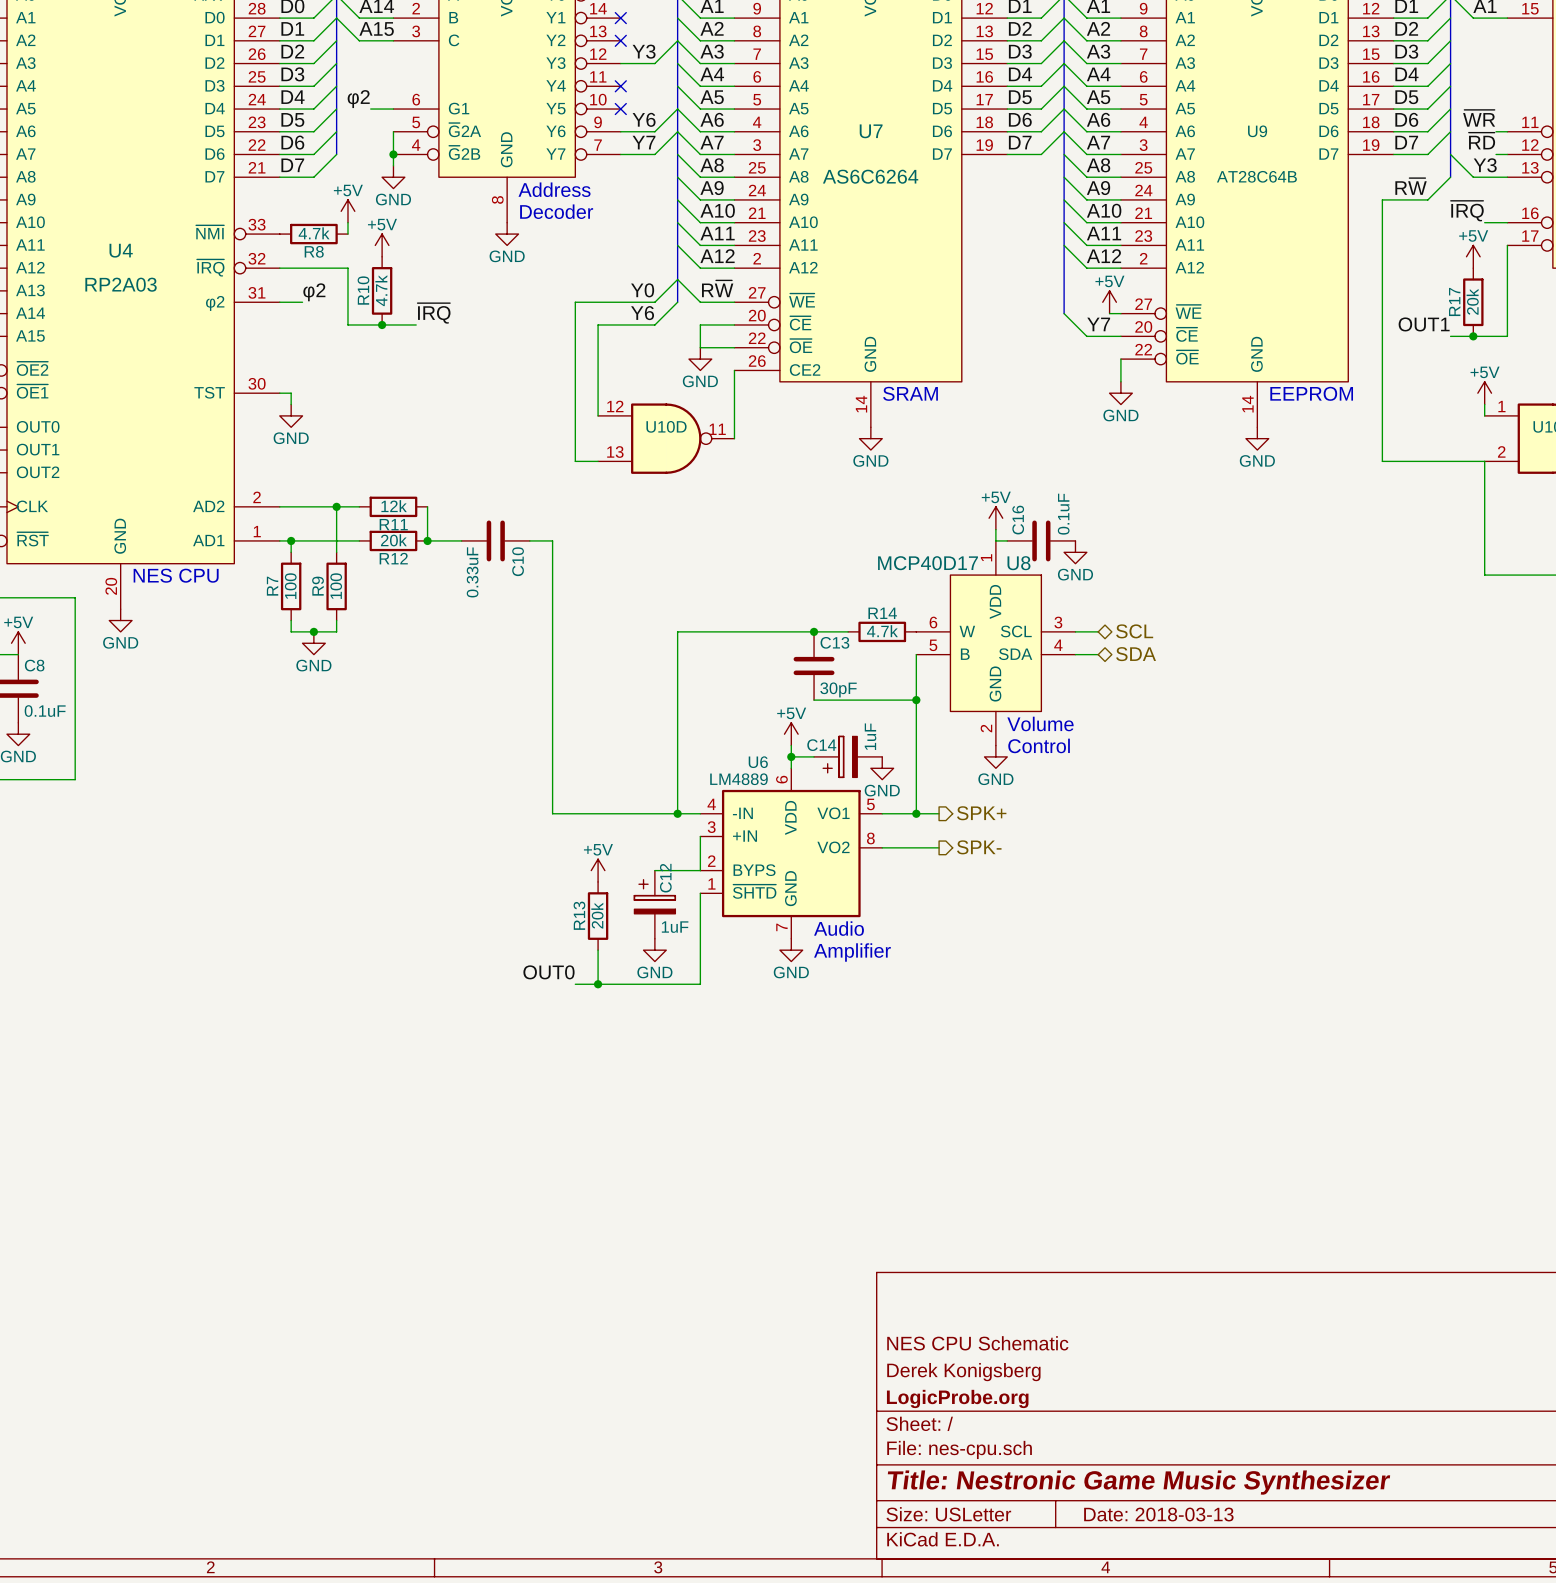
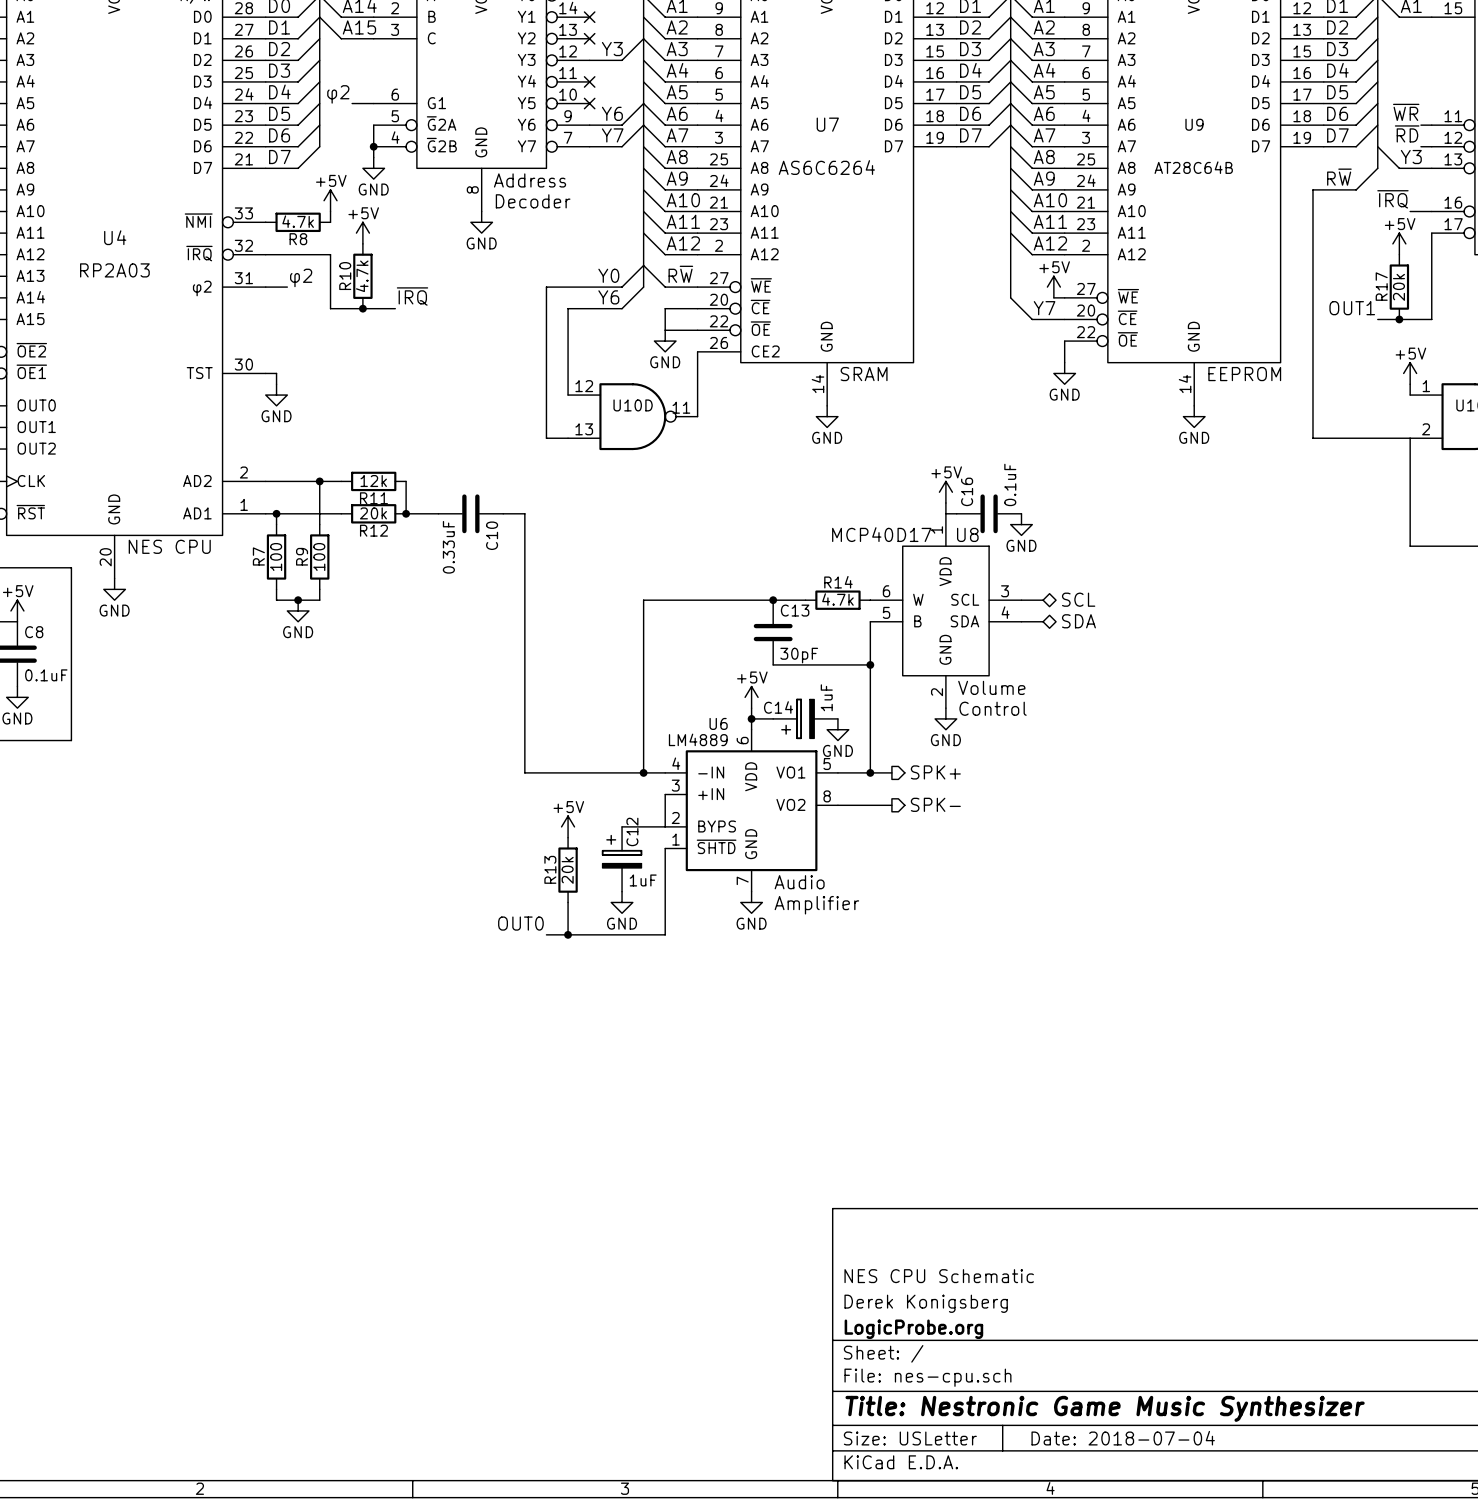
title block: Date: 2018-03-13 (1158, 1514) -> Date: 2018-07-04 (1123, 1438)

